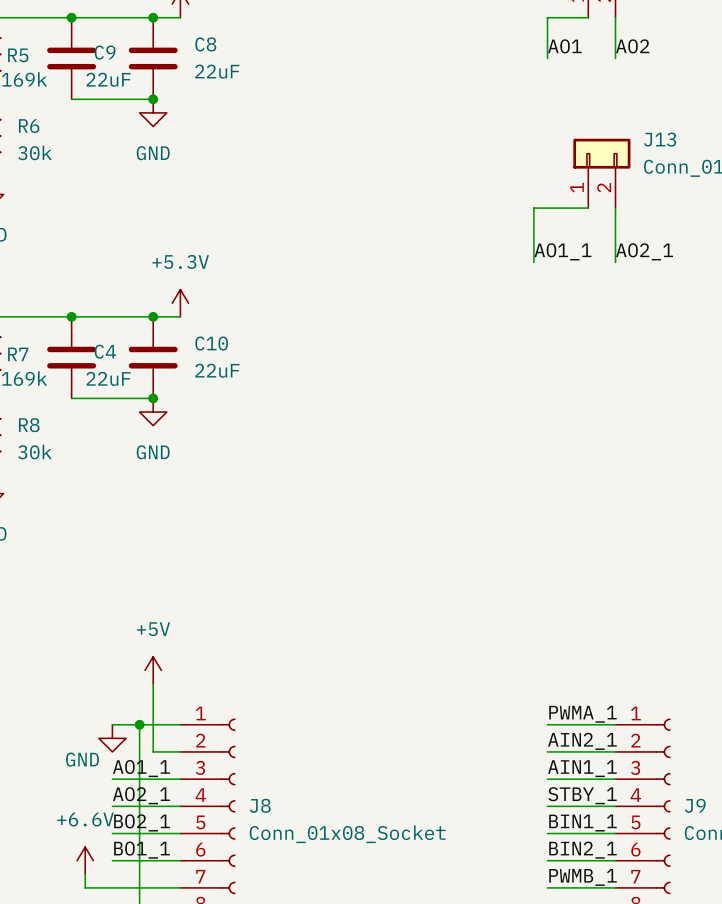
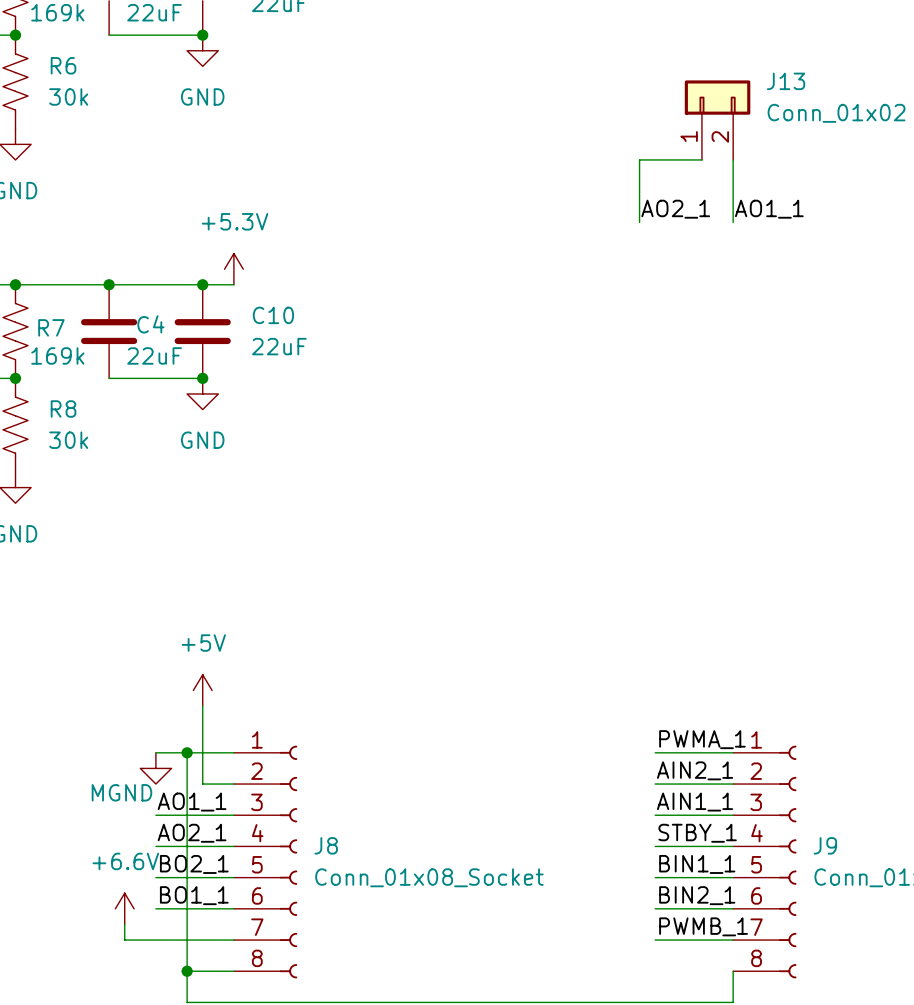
label: AO1_1 (562, 251) -> AO2_1 (675, 209)
label: AO2_1 (644, 251) -> AO1_1 (769, 209)
power symbol: GND (112, 738) -> MGND (155, 768)

